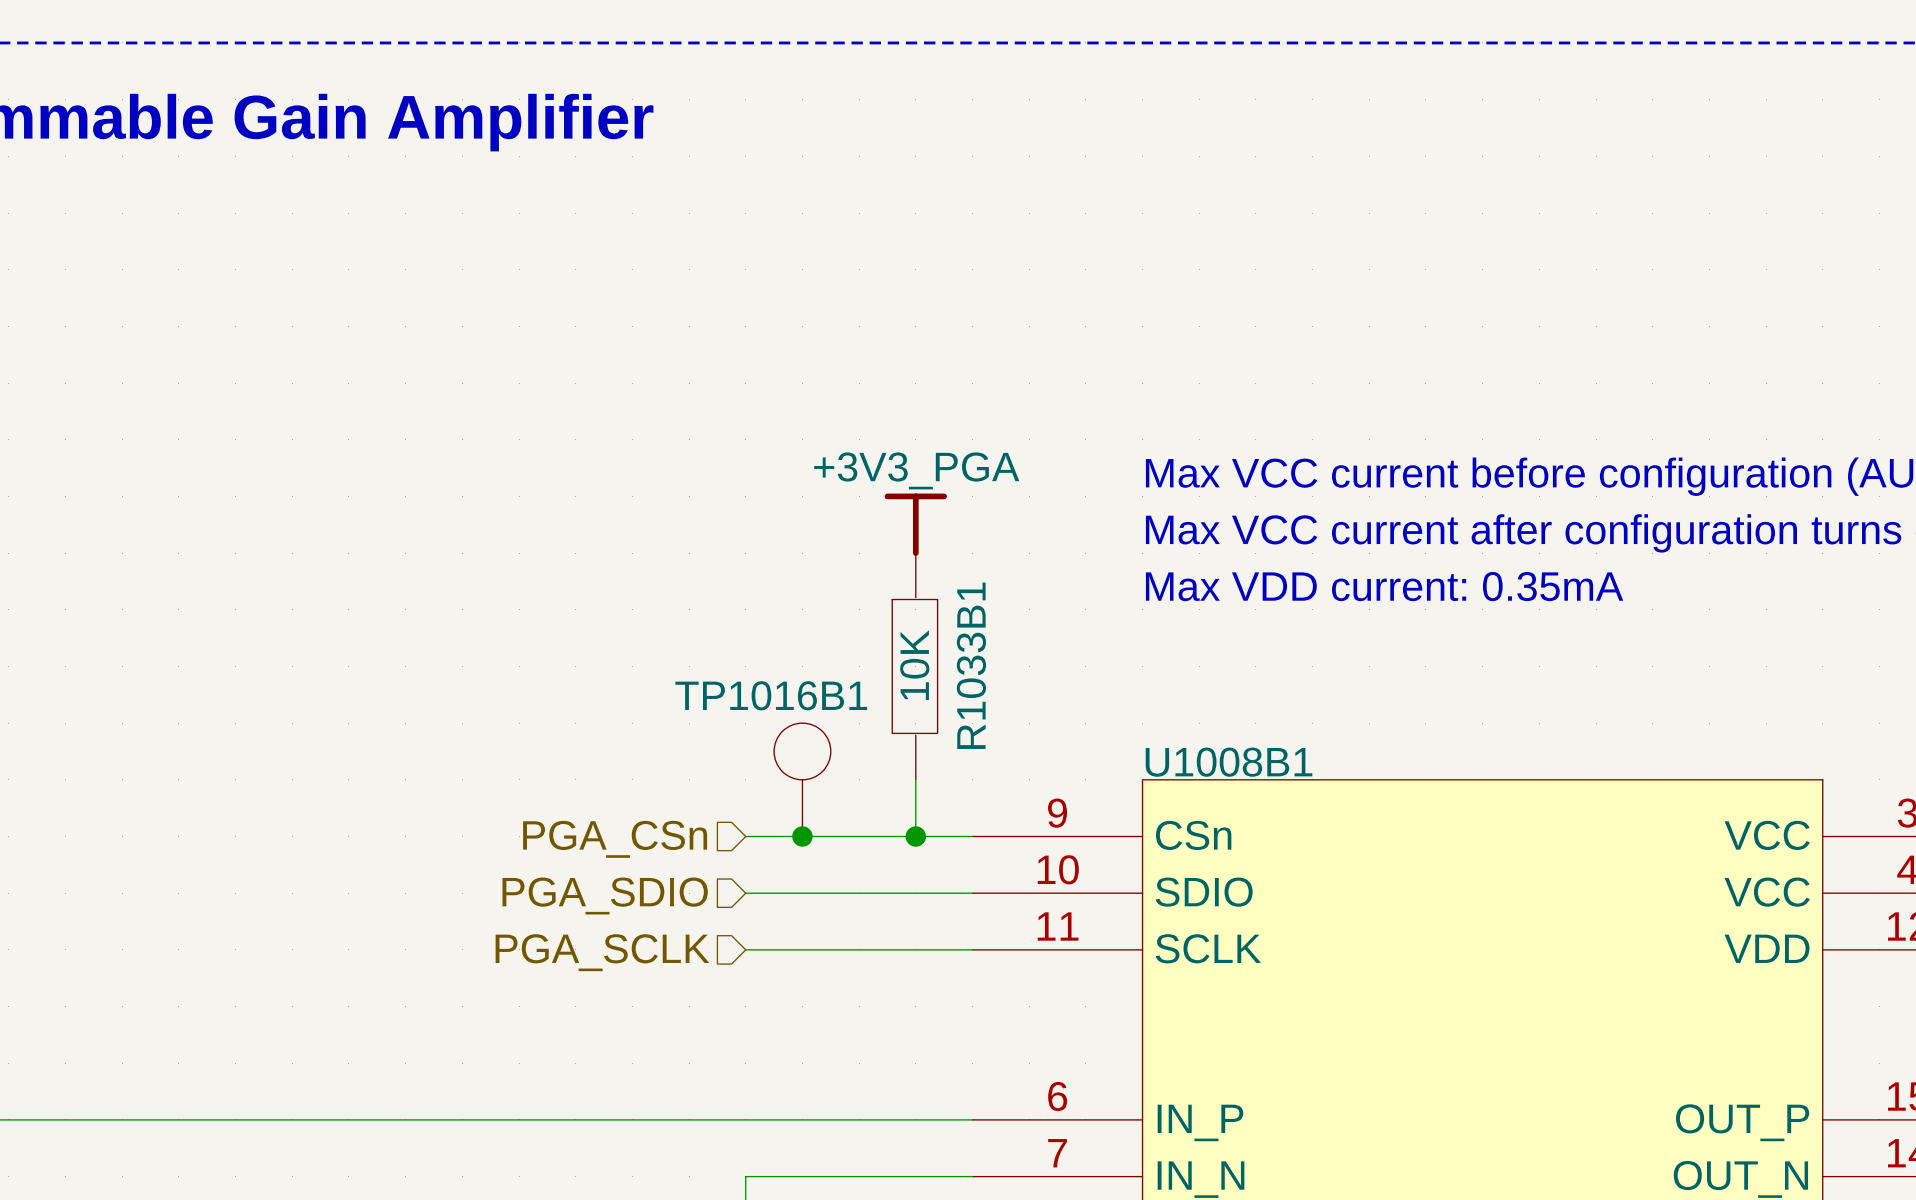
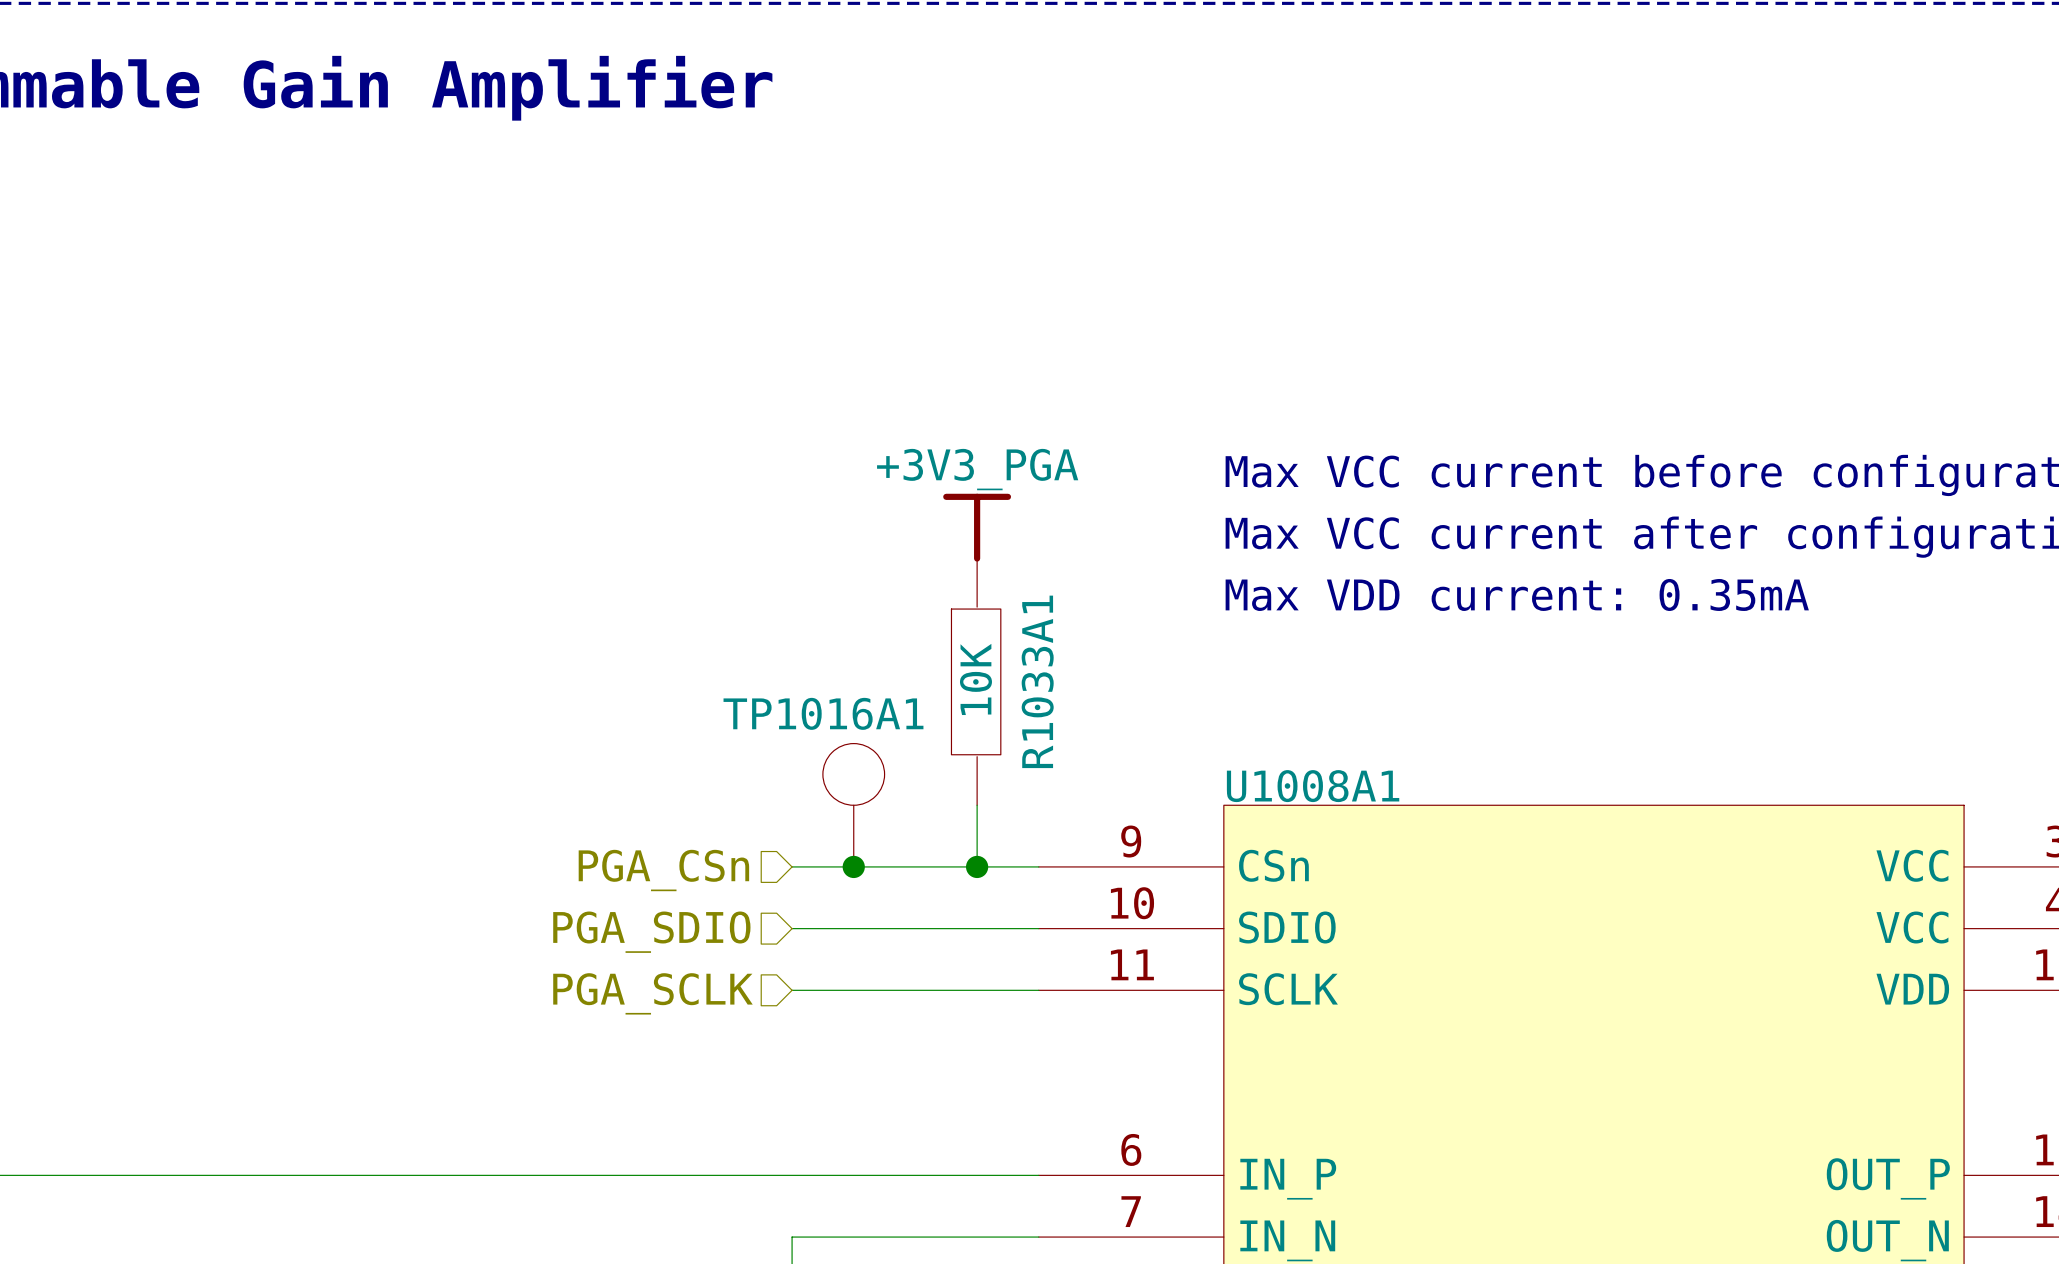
R1033B1 name: R1033B1 (971, 665) -> R1033A1 (1037, 681)
TP1016B1 name: TP1016B1 (771, 695) -> TP1016A1 (823, 713)
U1008B1 name: U1008B1 (1229, 762) -> U1008A1 (1313, 786)

